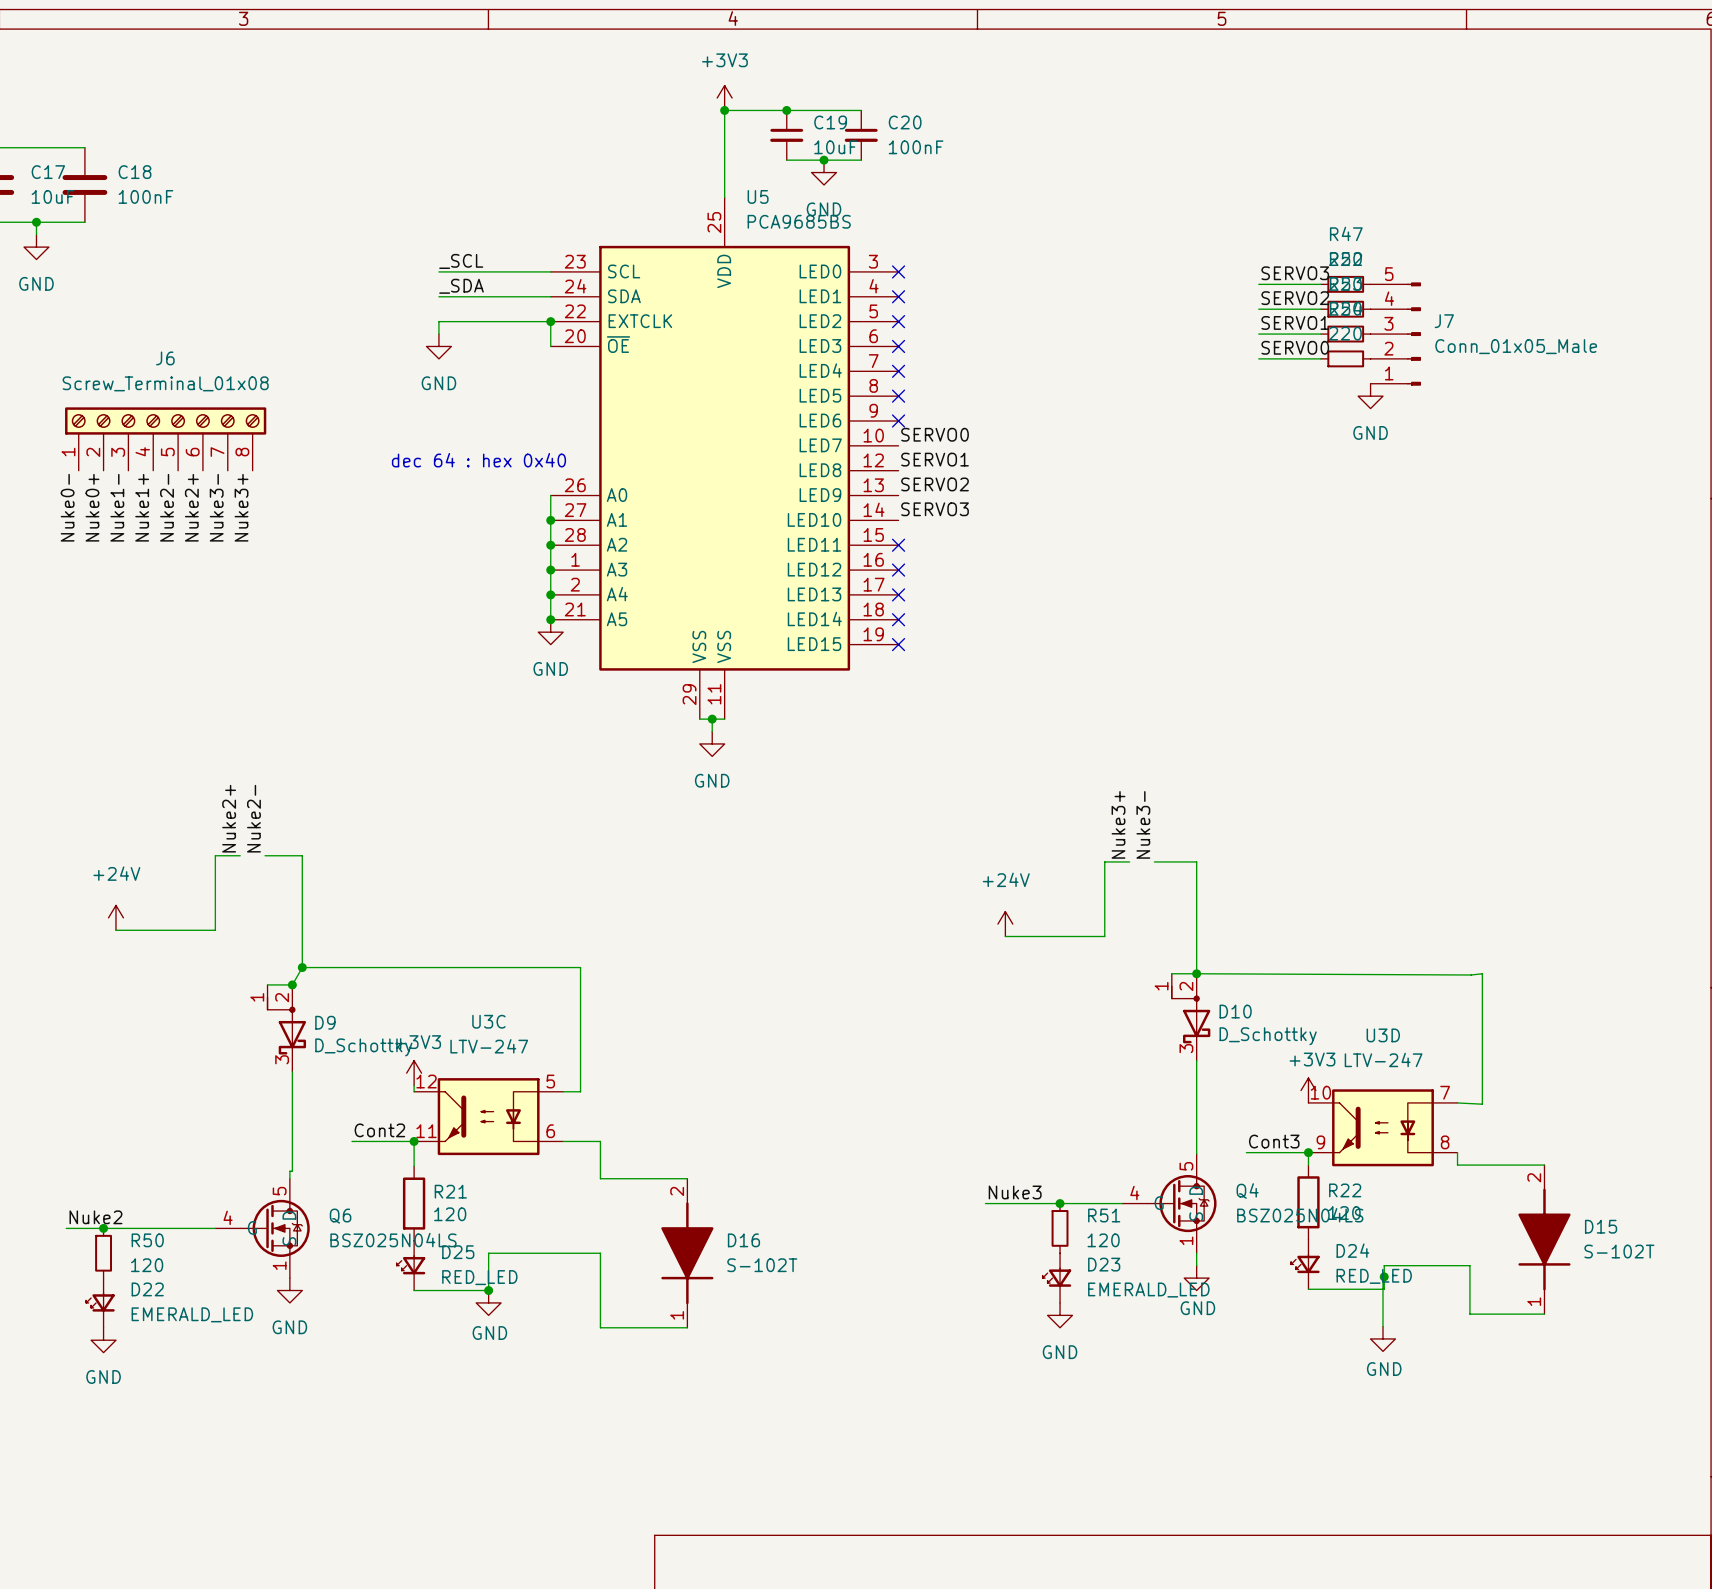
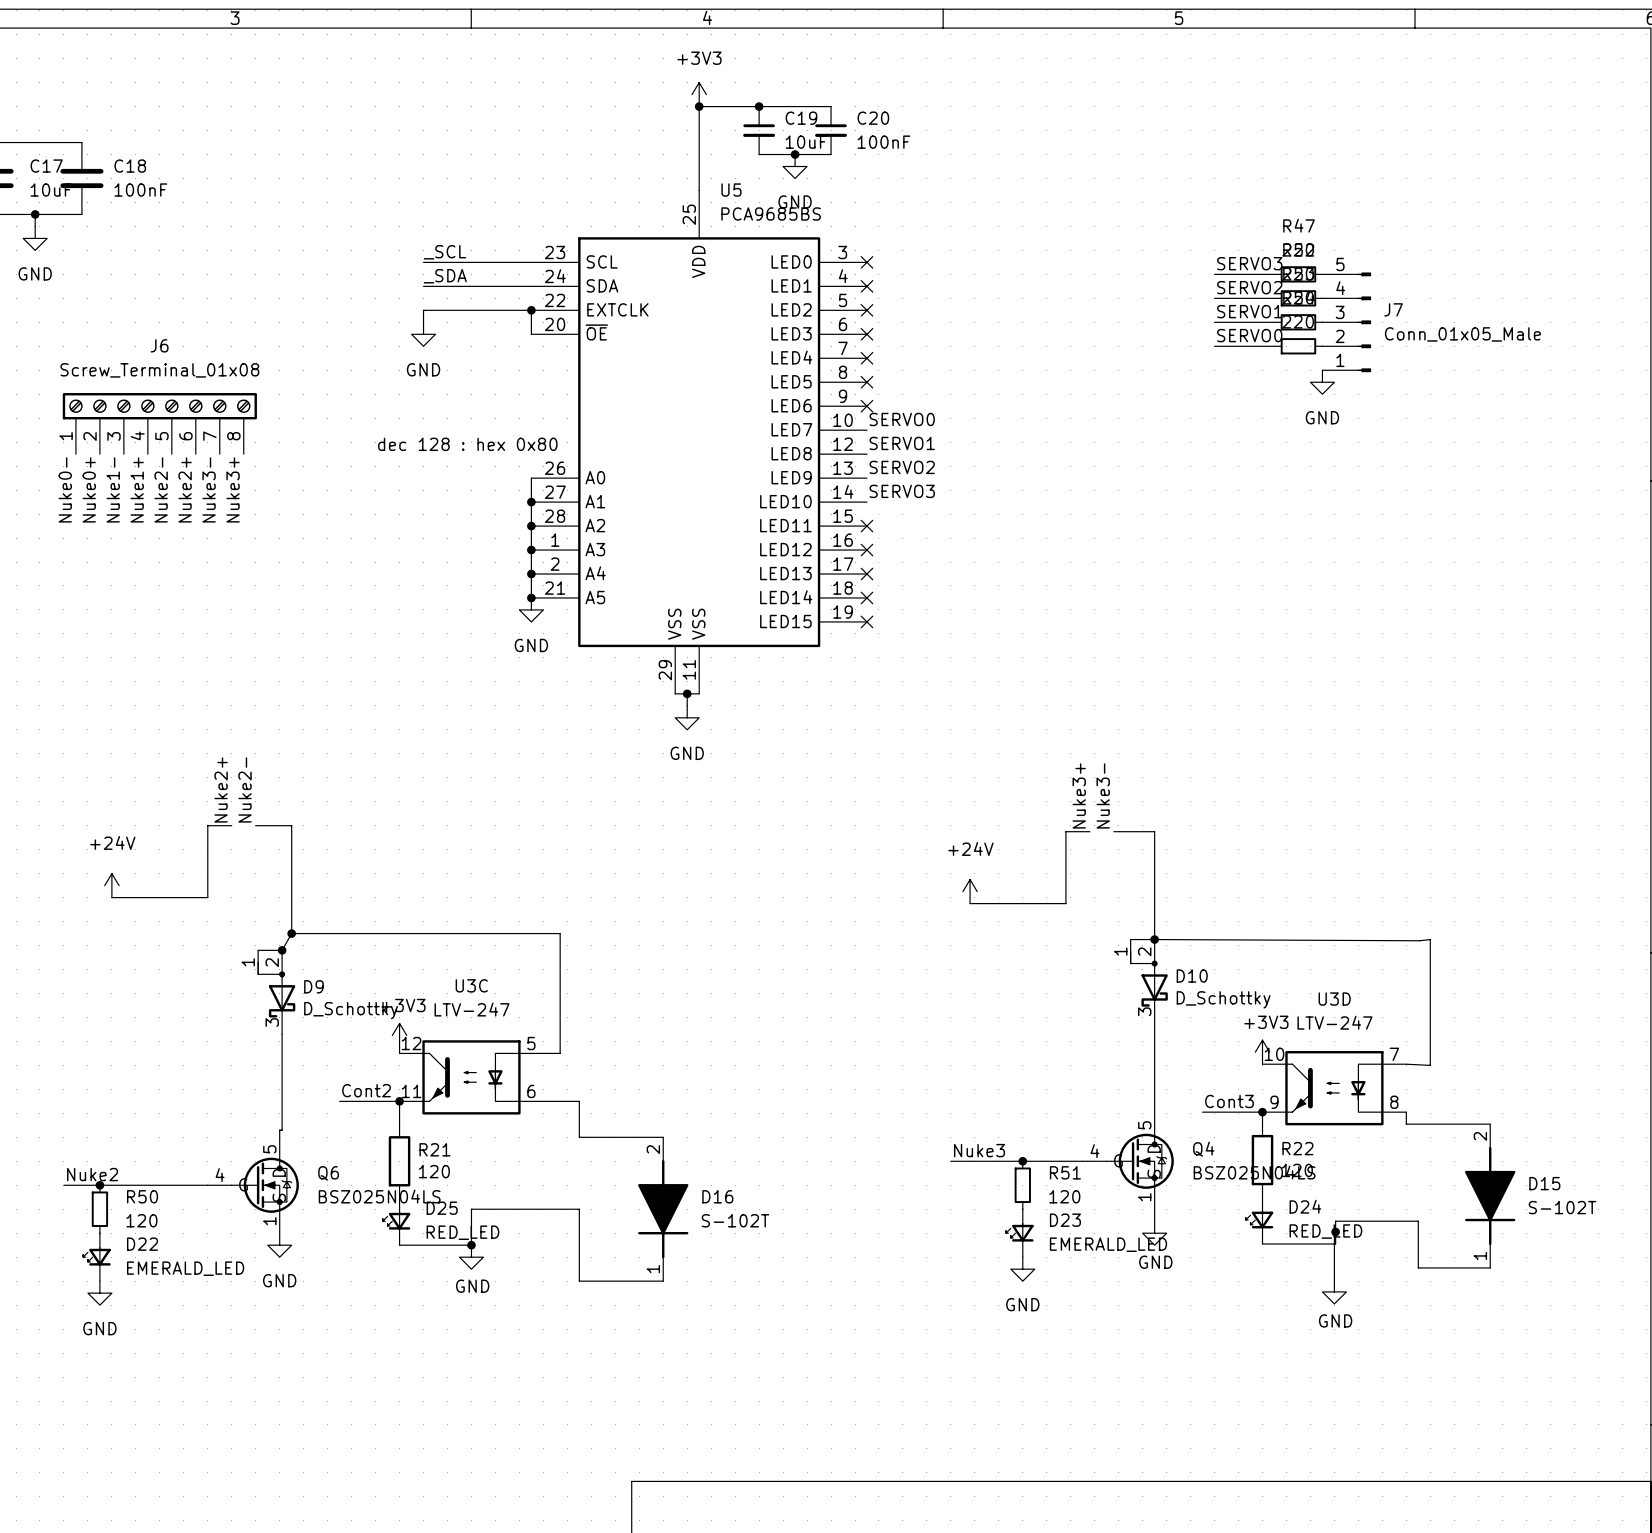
text: dec 64 : hex 0x40 (478, 460) -> dec 128 : hex 0x80 (467, 444)

